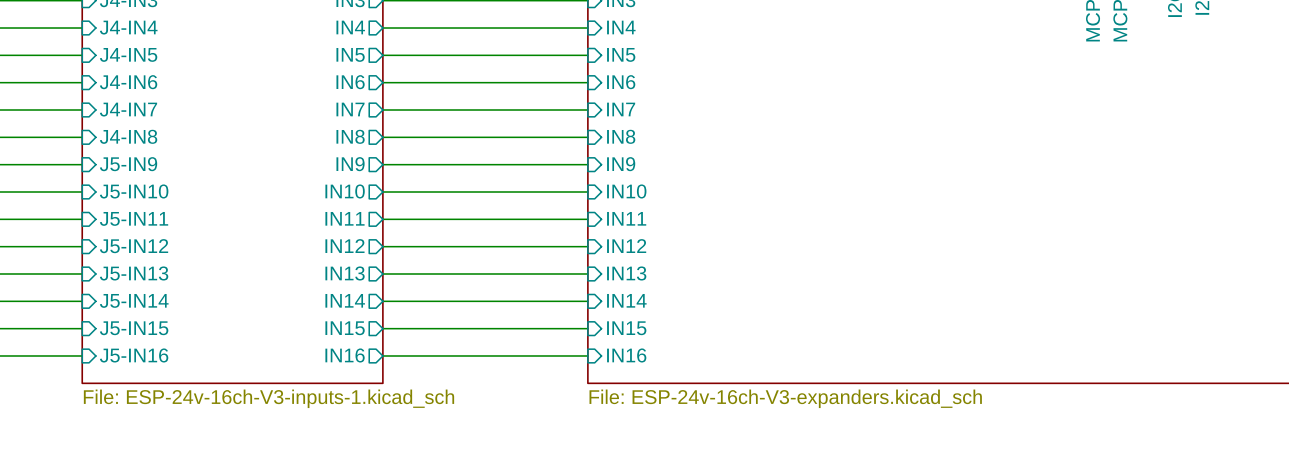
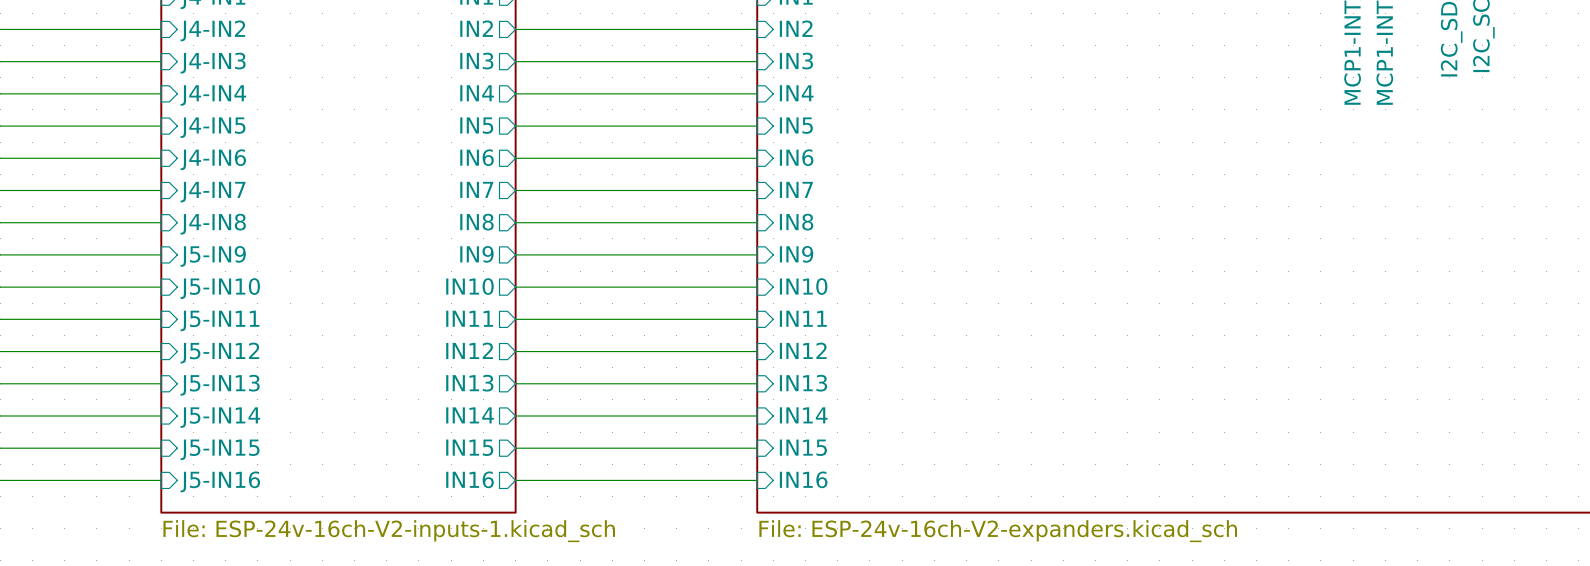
sheet value: File: ESP-24v-16ch-V3-inputs-1.kicad_sch (268, 398) -> File: ESP-24v-16ch-V2-inputs-1.kicad_sch (389, 531)
sheet value: File: ESP-24v-16ch-V3-expanders.kicad_sch (785, 398) -> File: ESP-24v-16ch-V2-expanders.kicad_sch (998, 531)

